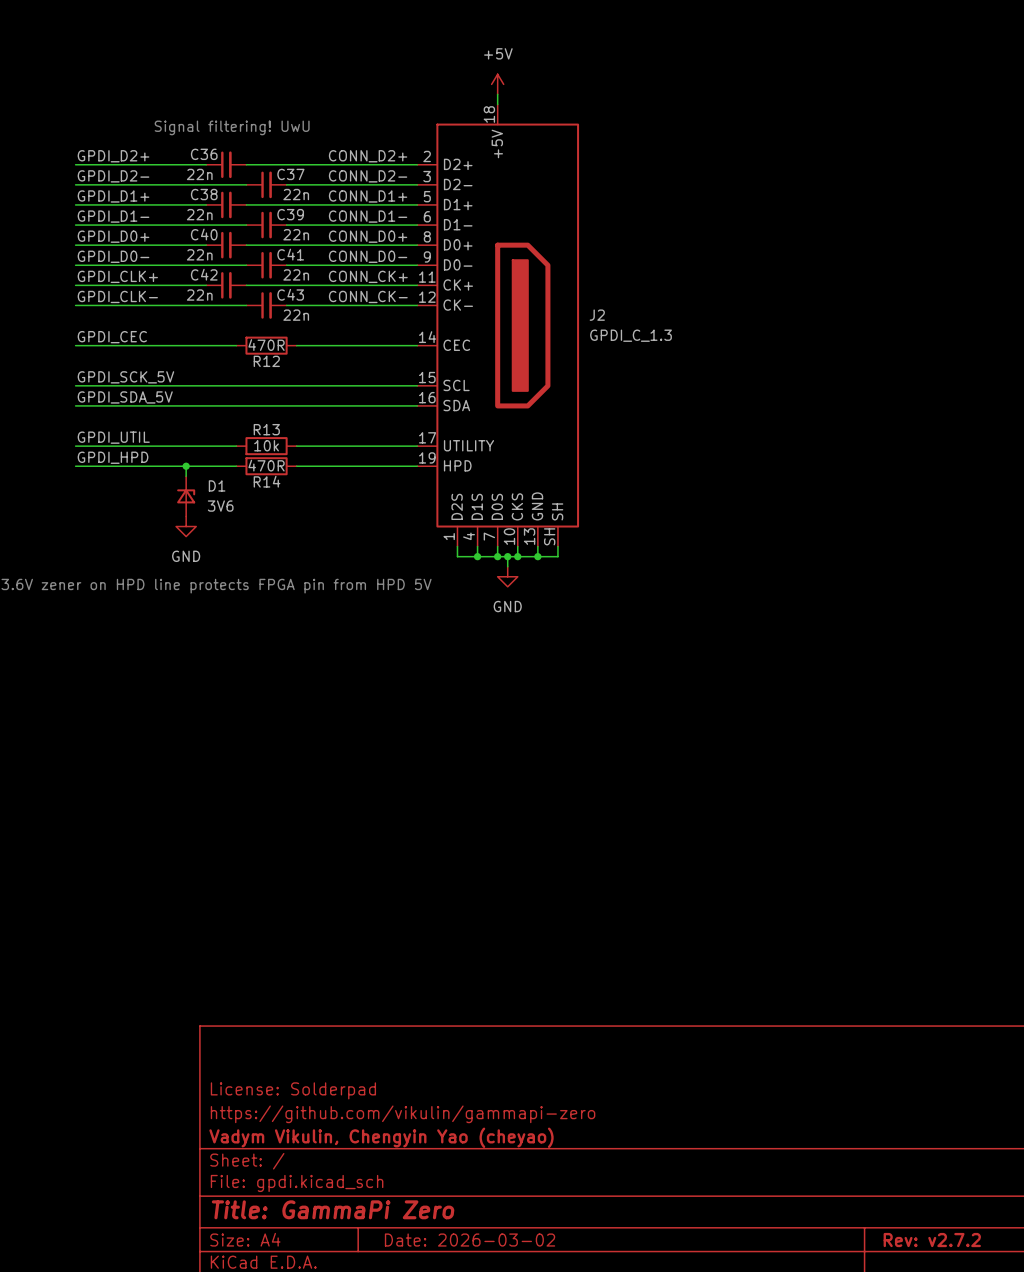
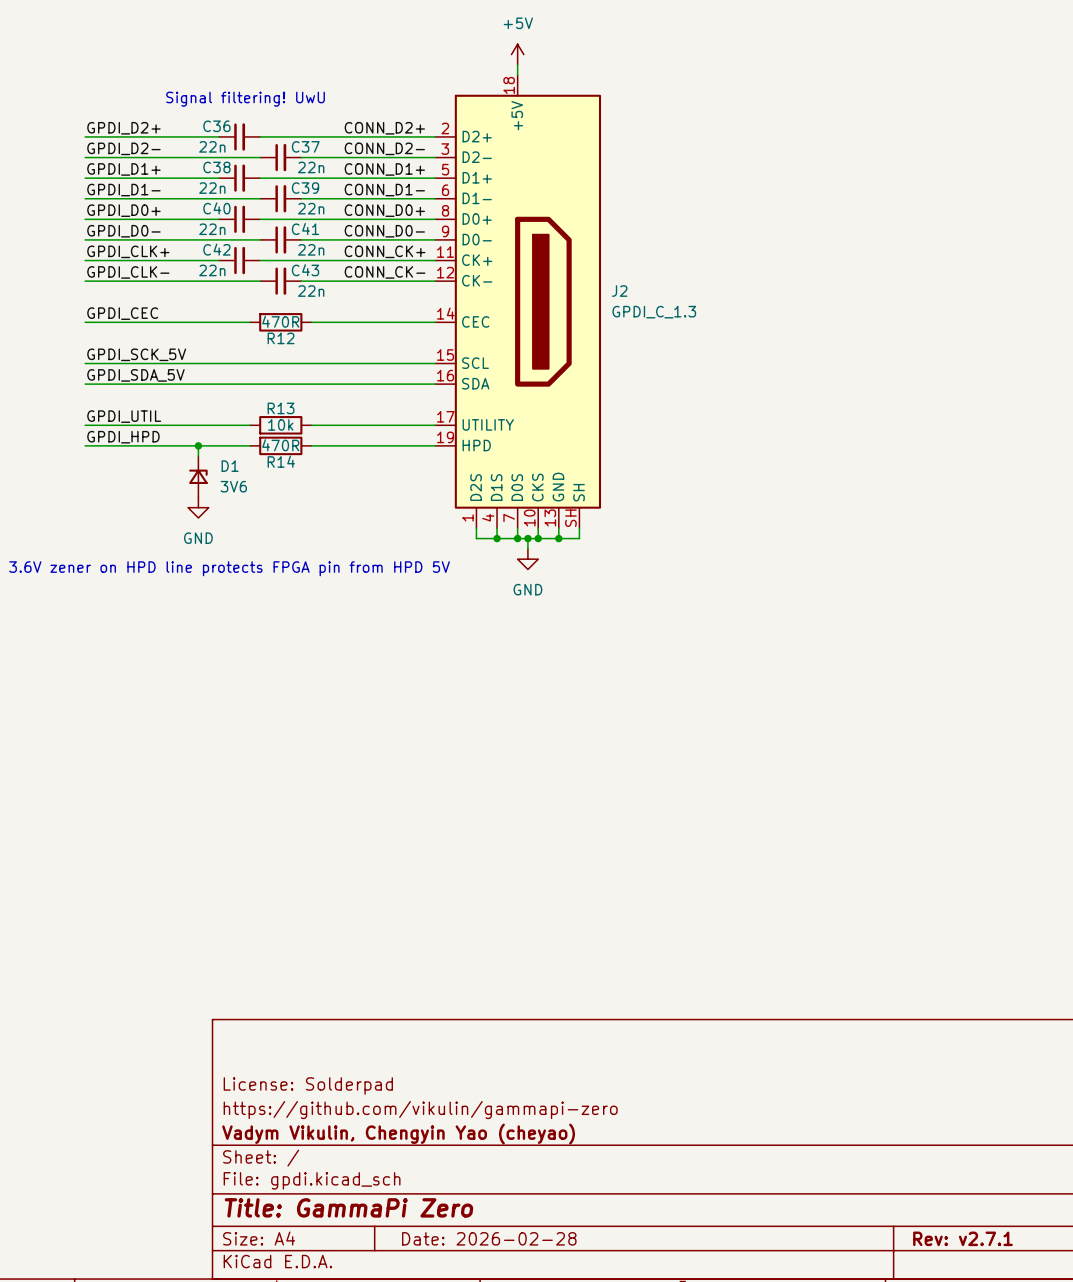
title block: Date: 2026-03-02 (470, 1240) -> Date: 2026-02-28 (489, 1238)
title block: Rev: v2.7.2 (932, 1240) -> Rev: v2.7.1 (962, 1238)

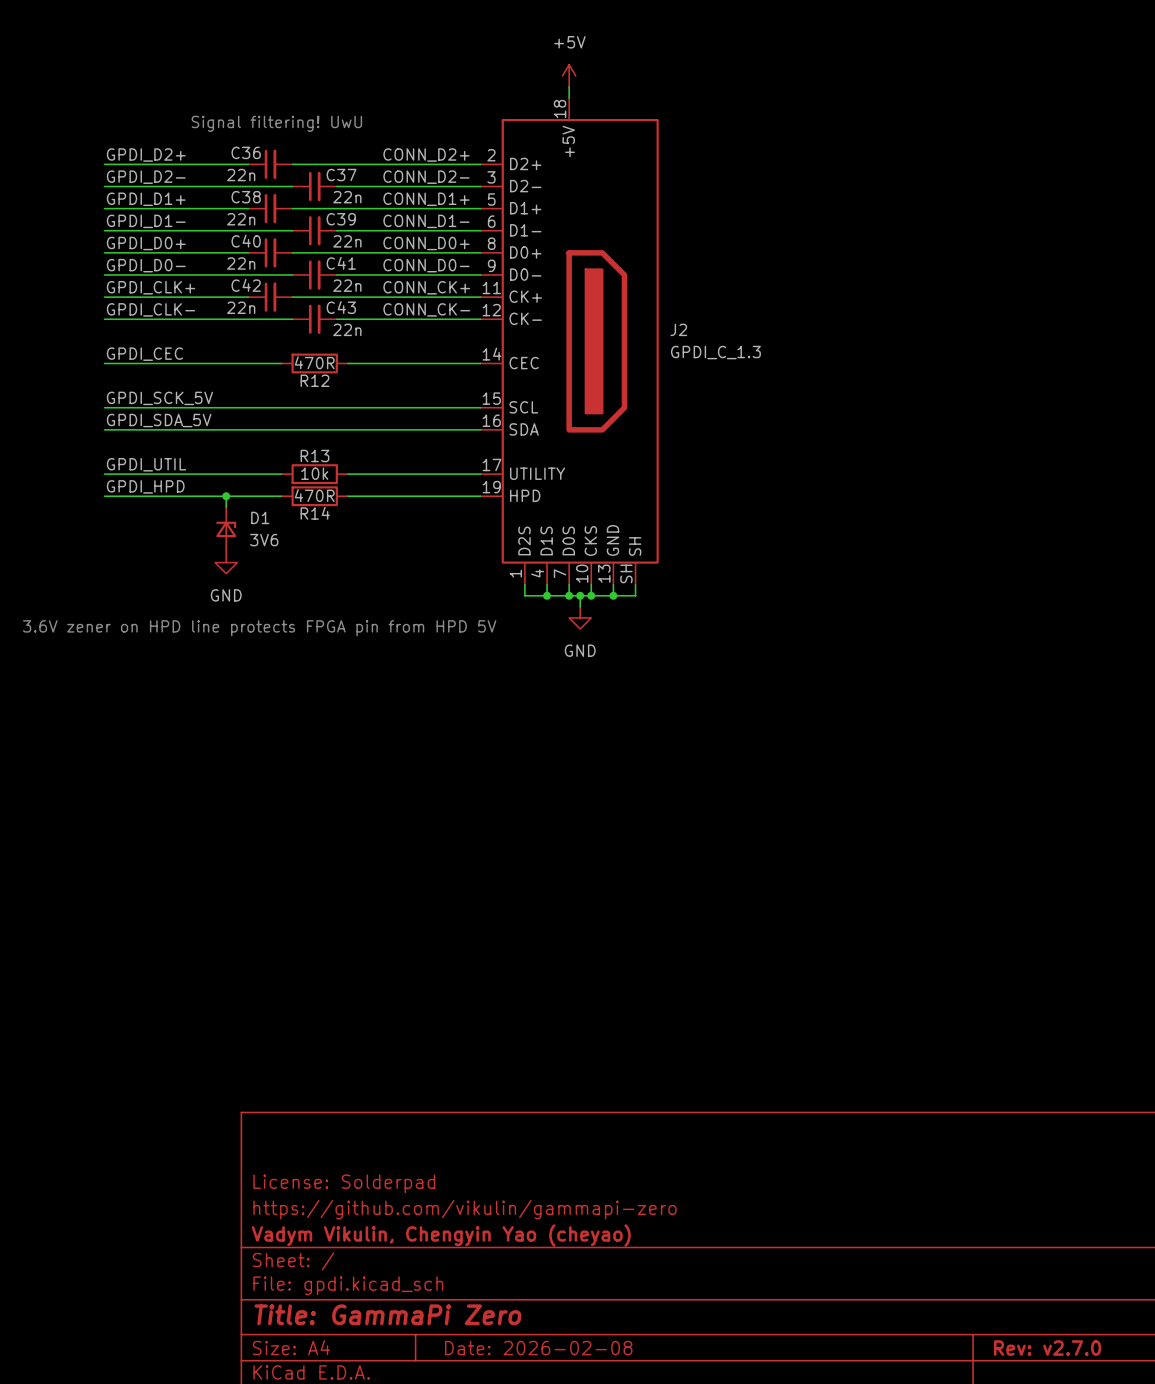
title block: Date: 2026-02-28 (489, 1238) -> Date: 2026-02-08 (538, 1348)
title block: Rev: v2.7.1 (962, 1238) -> Rev: v2.7.0 (1047, 1348)

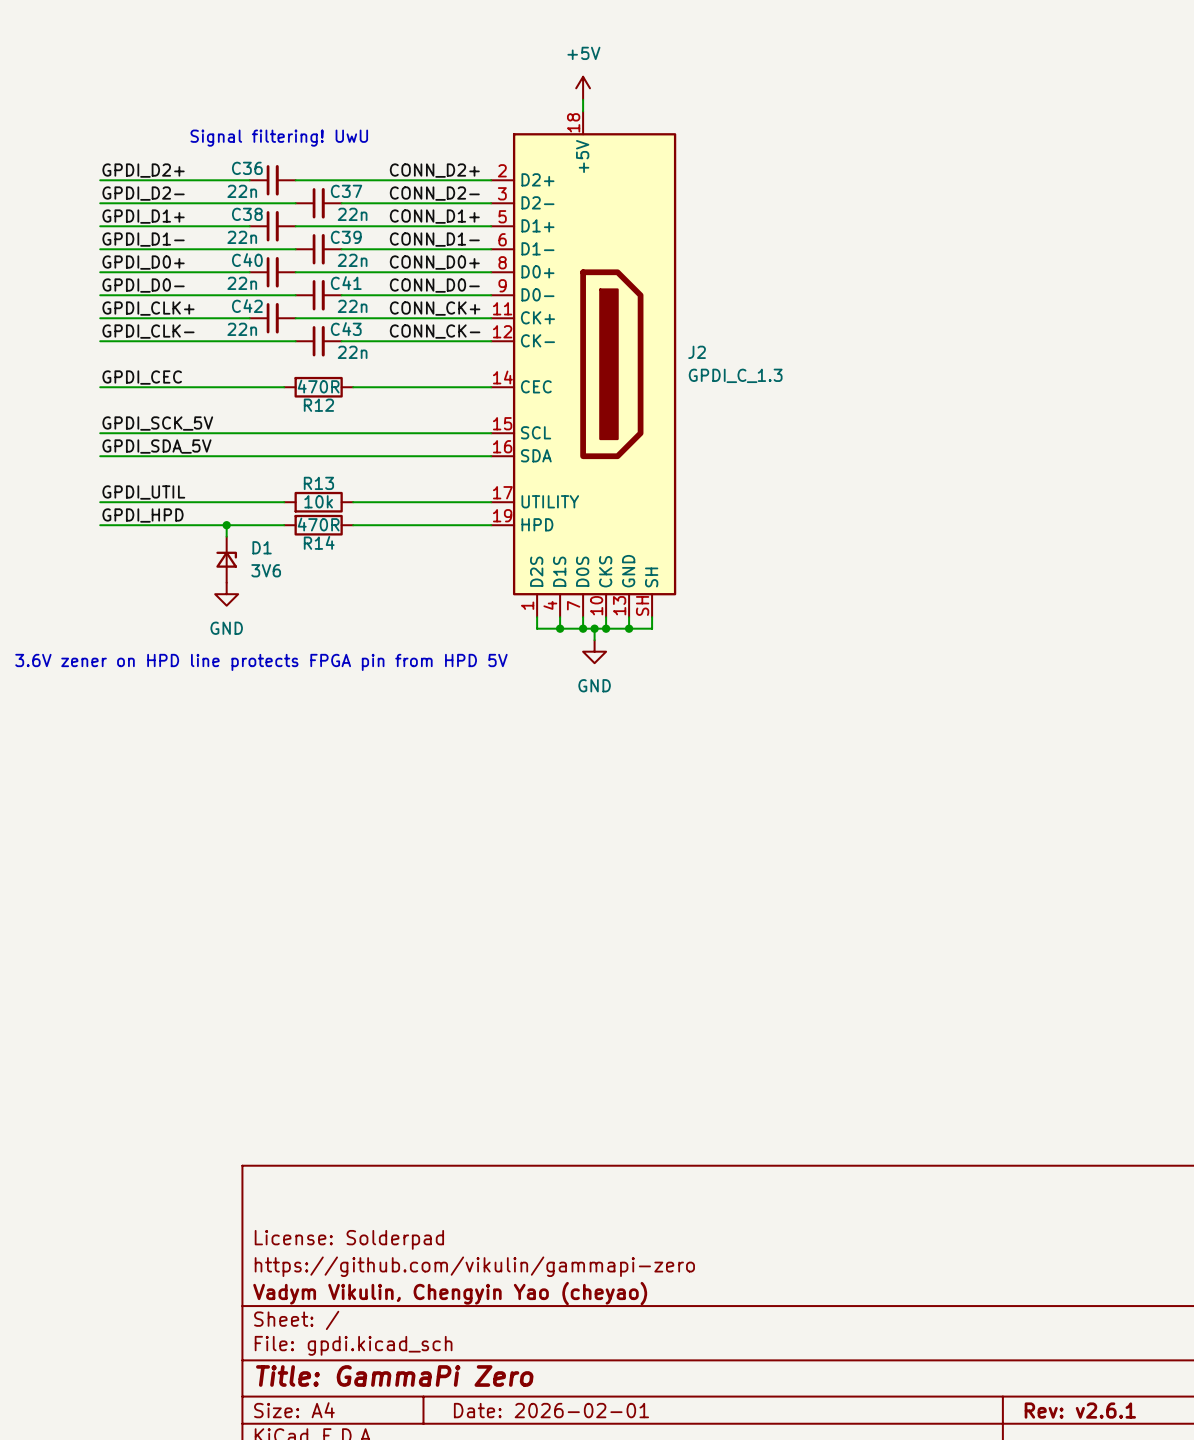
title block: Date: 2026-02-08 (538, 1348) -> Date: 2026-02-01 (551, 1410)
title block: Rev: v2.7.0 (1047, 1348) -> Rev: v2.6.1 (1080, 1410)

